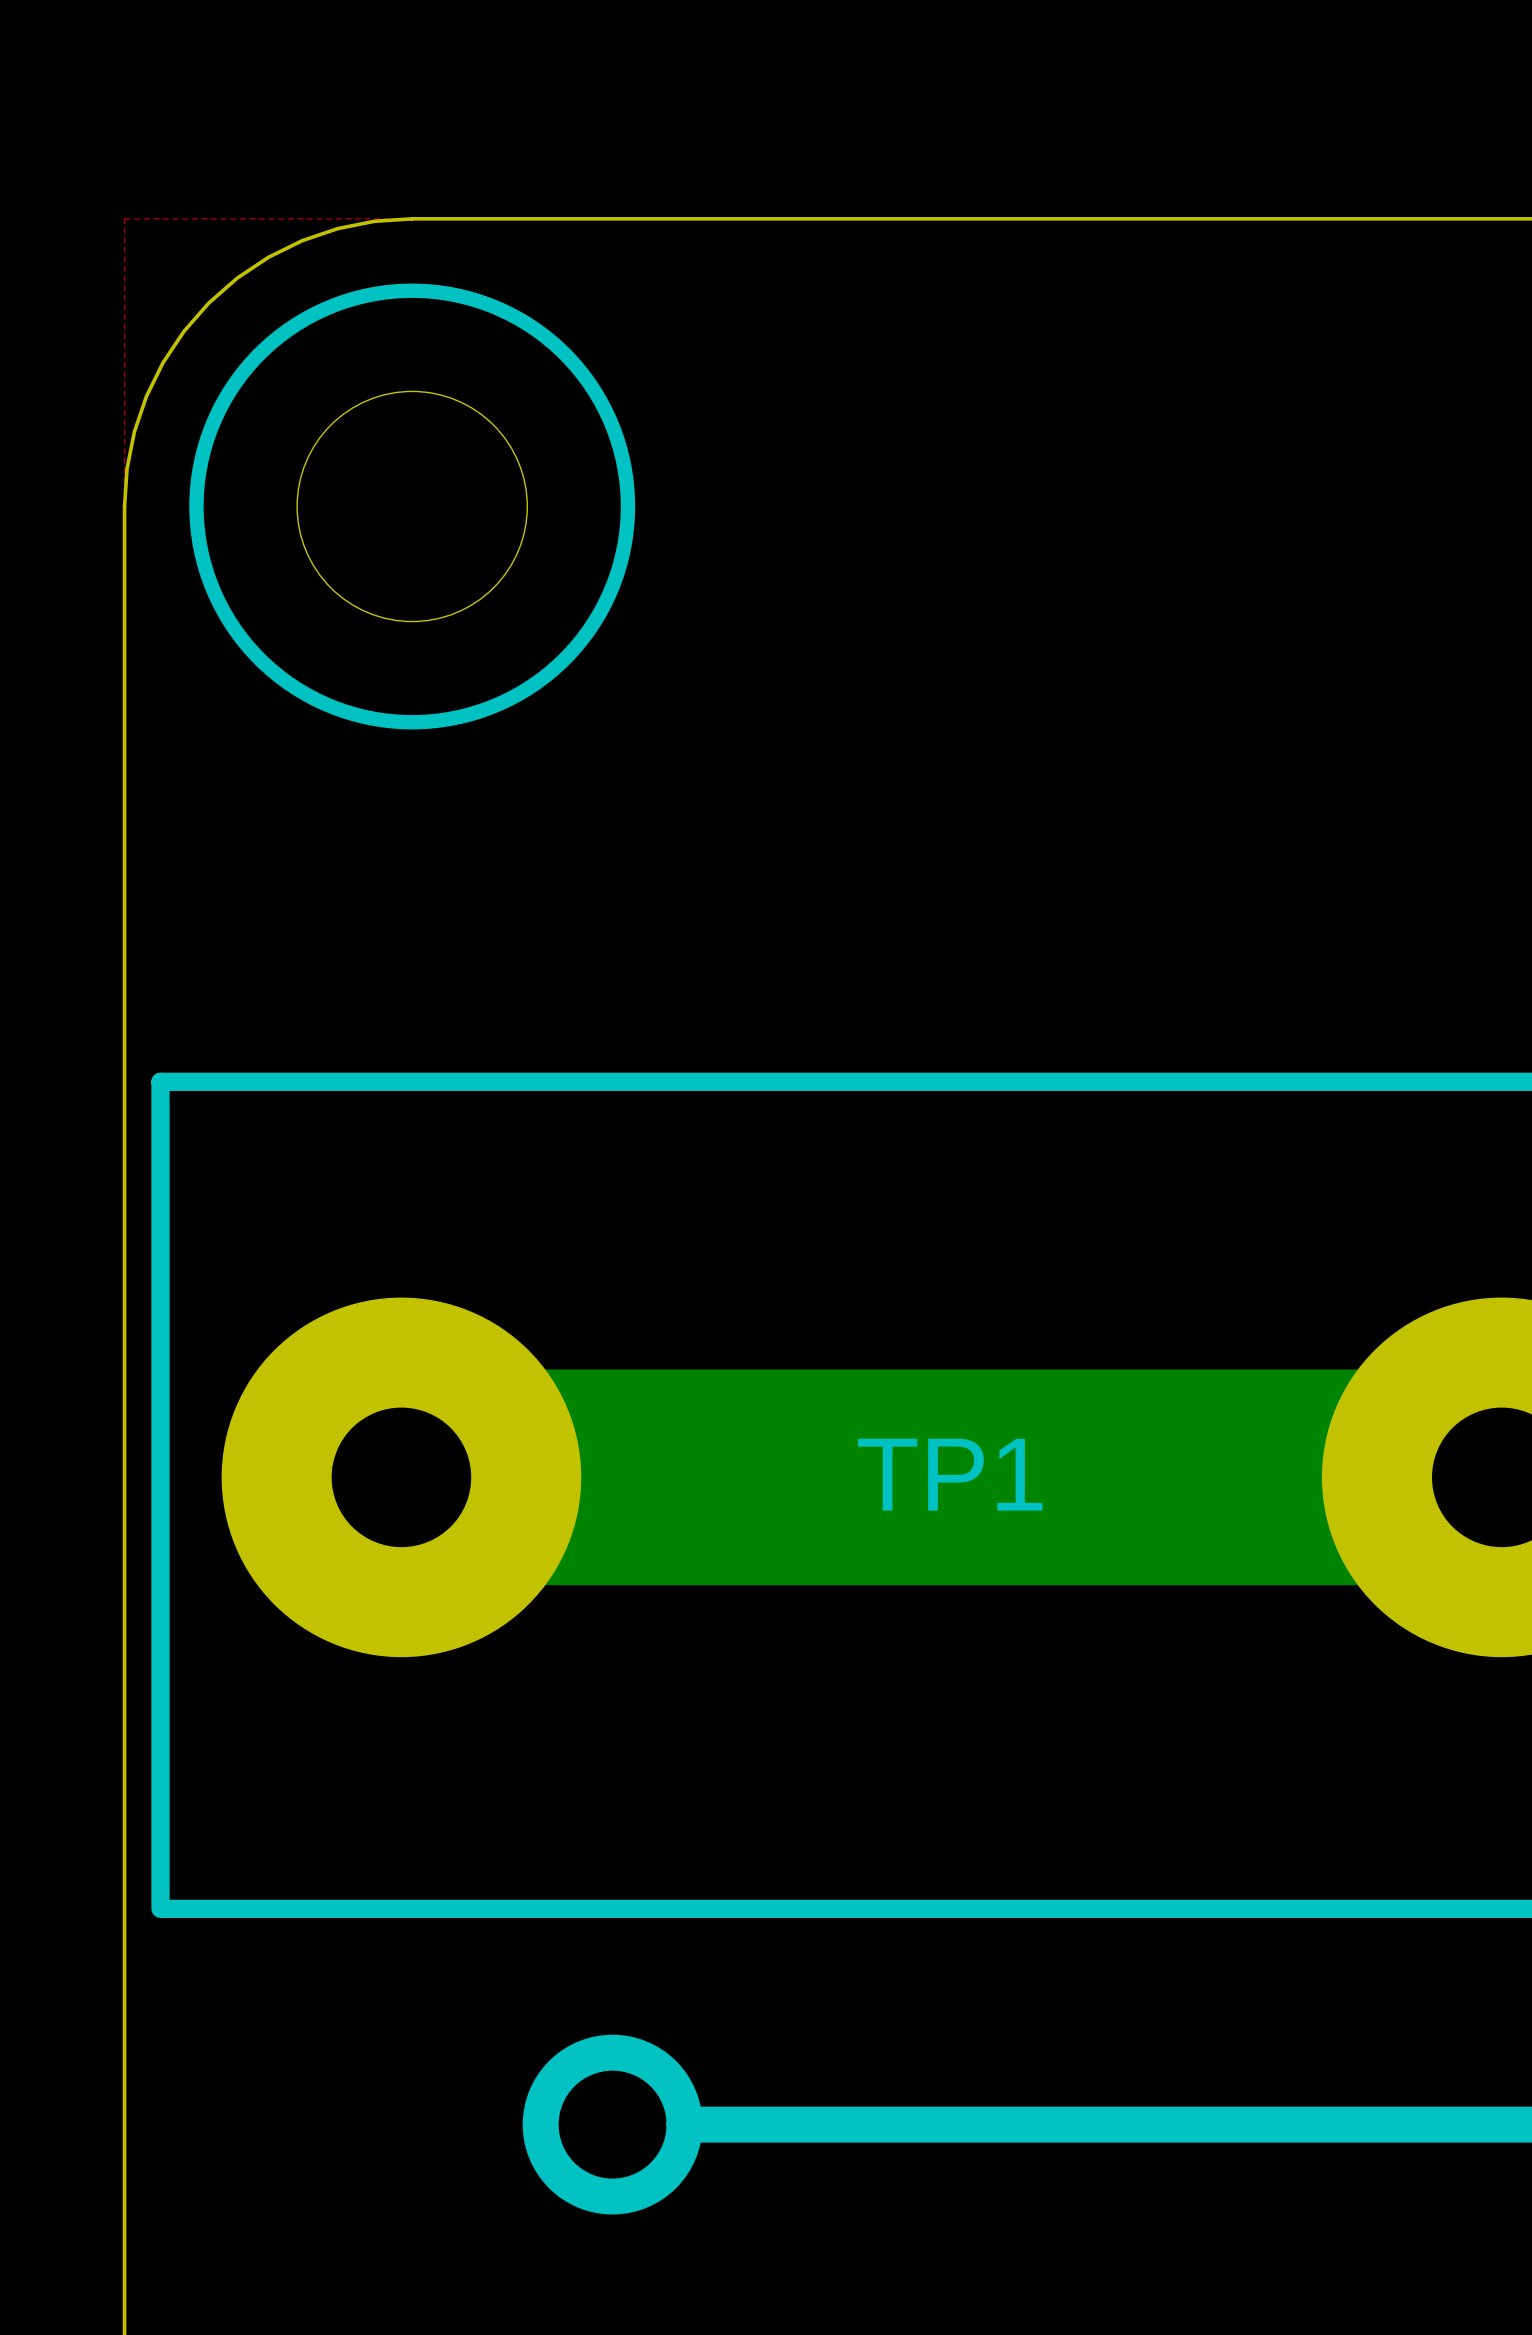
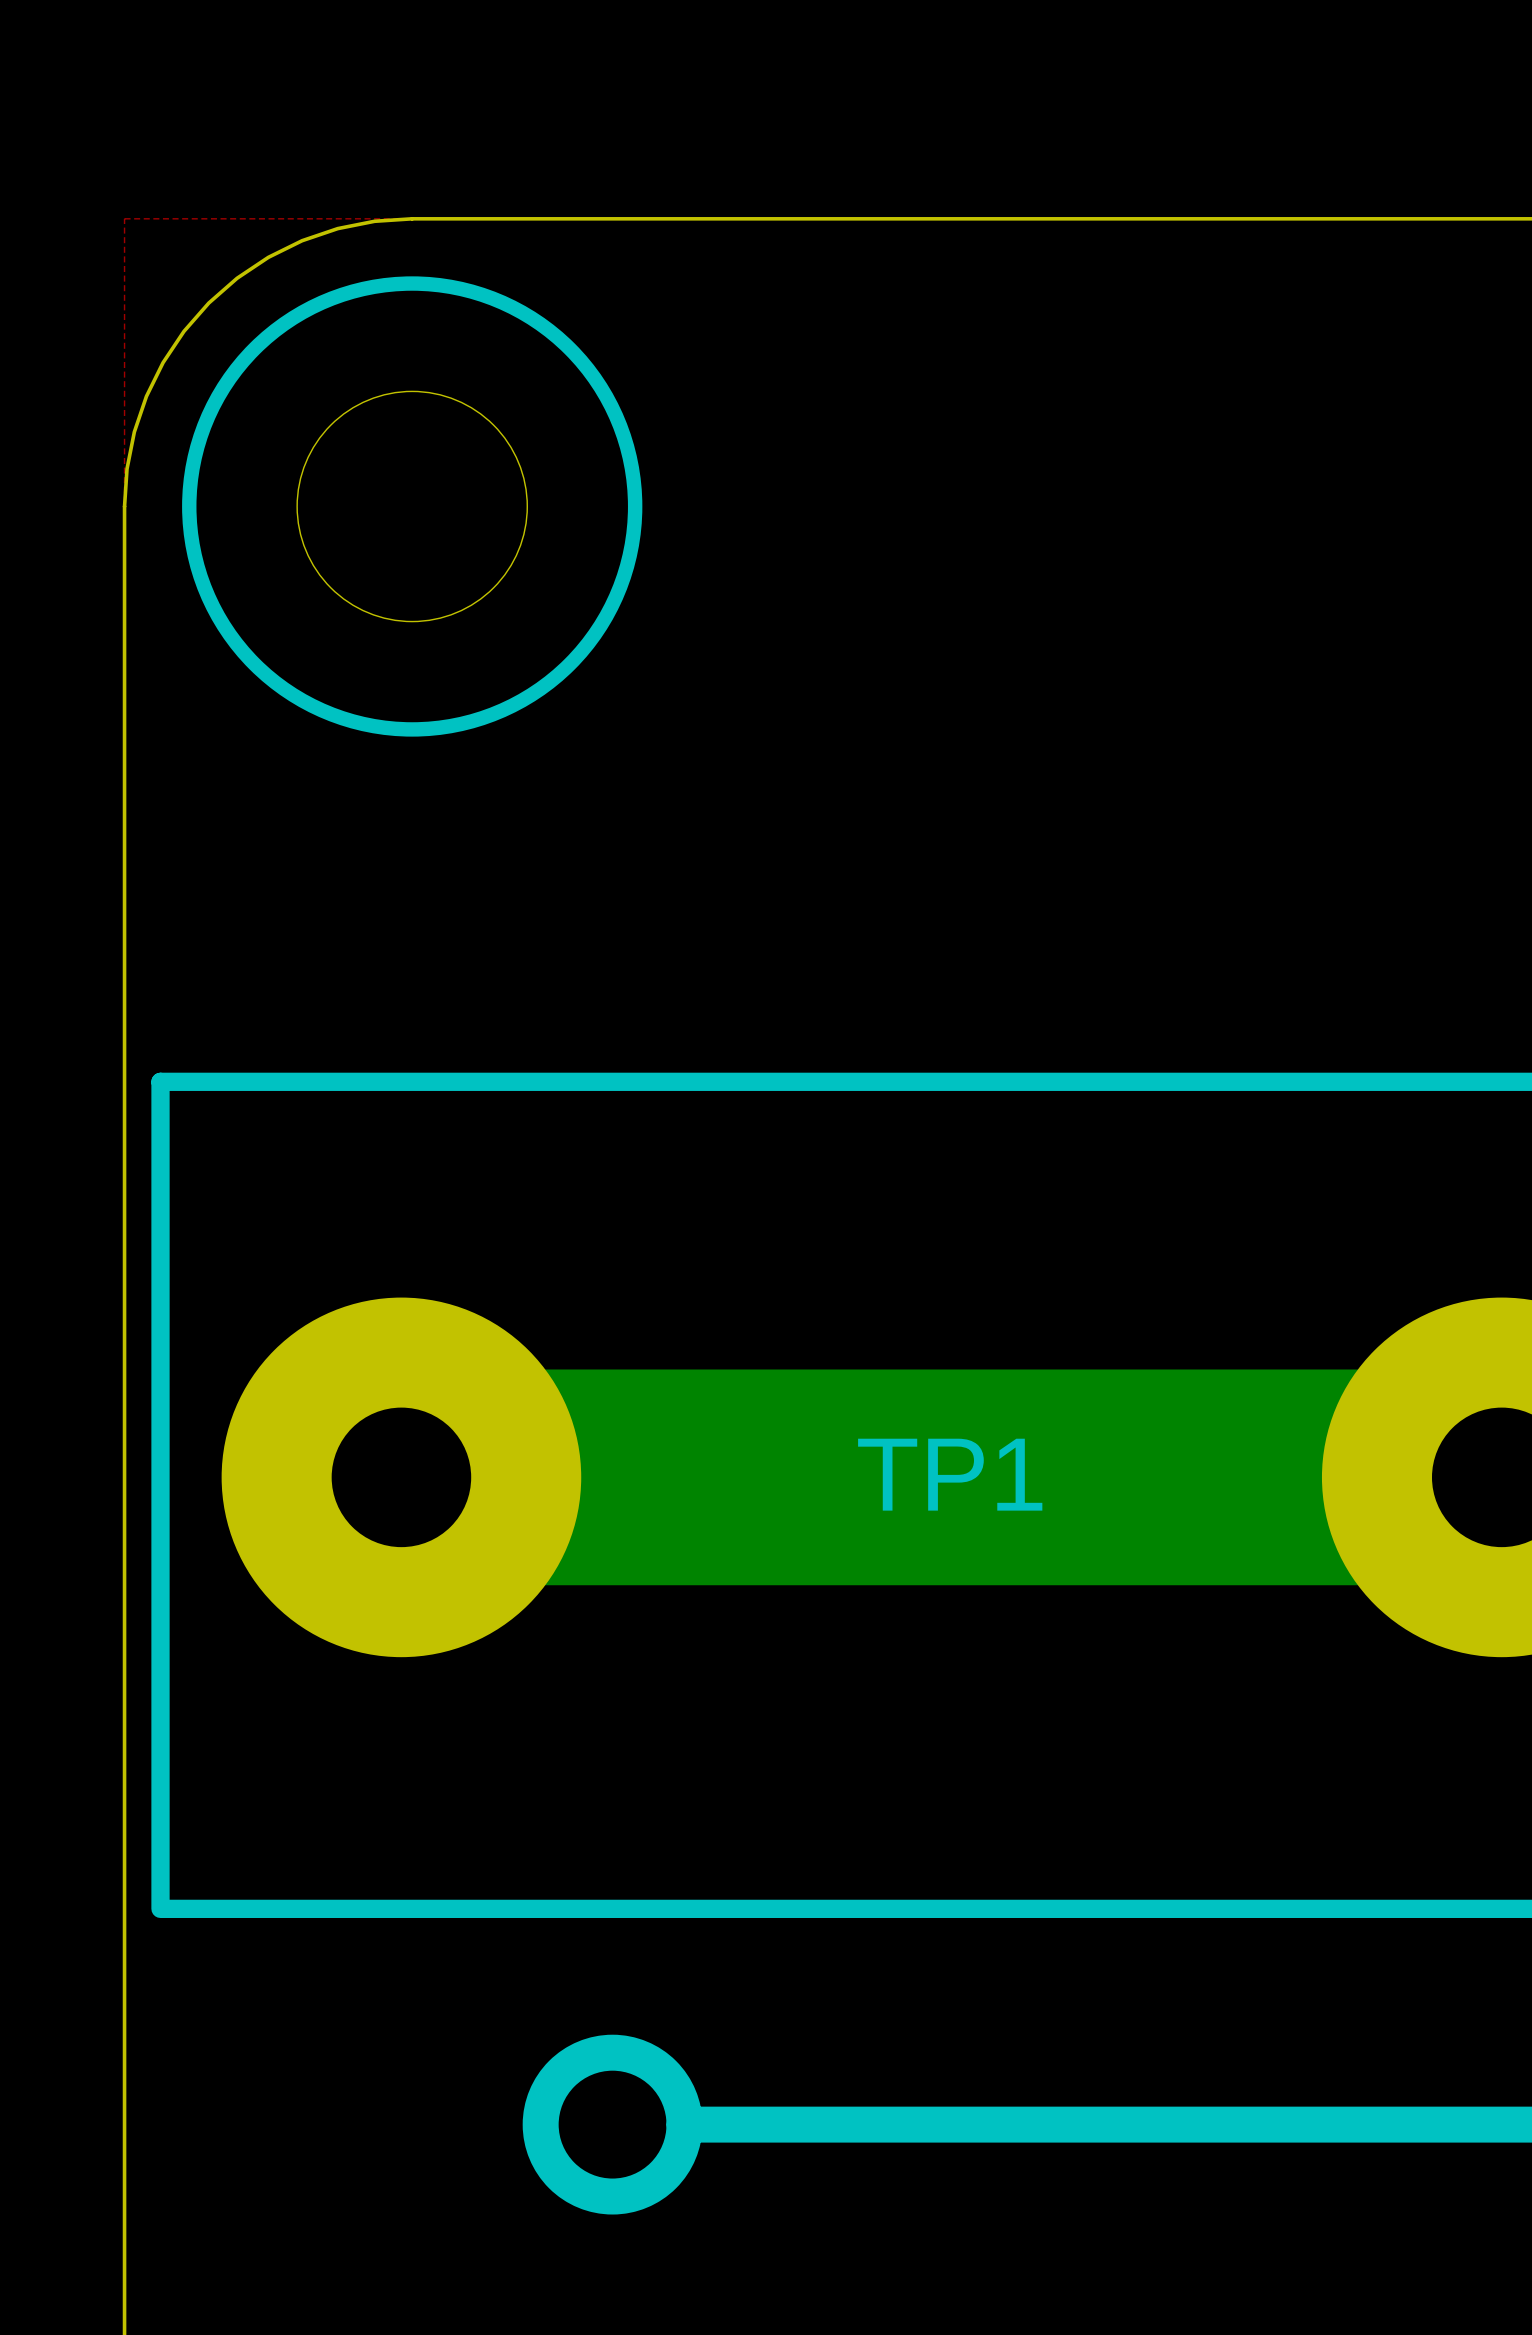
drawing shape: [189, 283, 636, 730] -> [182, 276, 643, 737]

